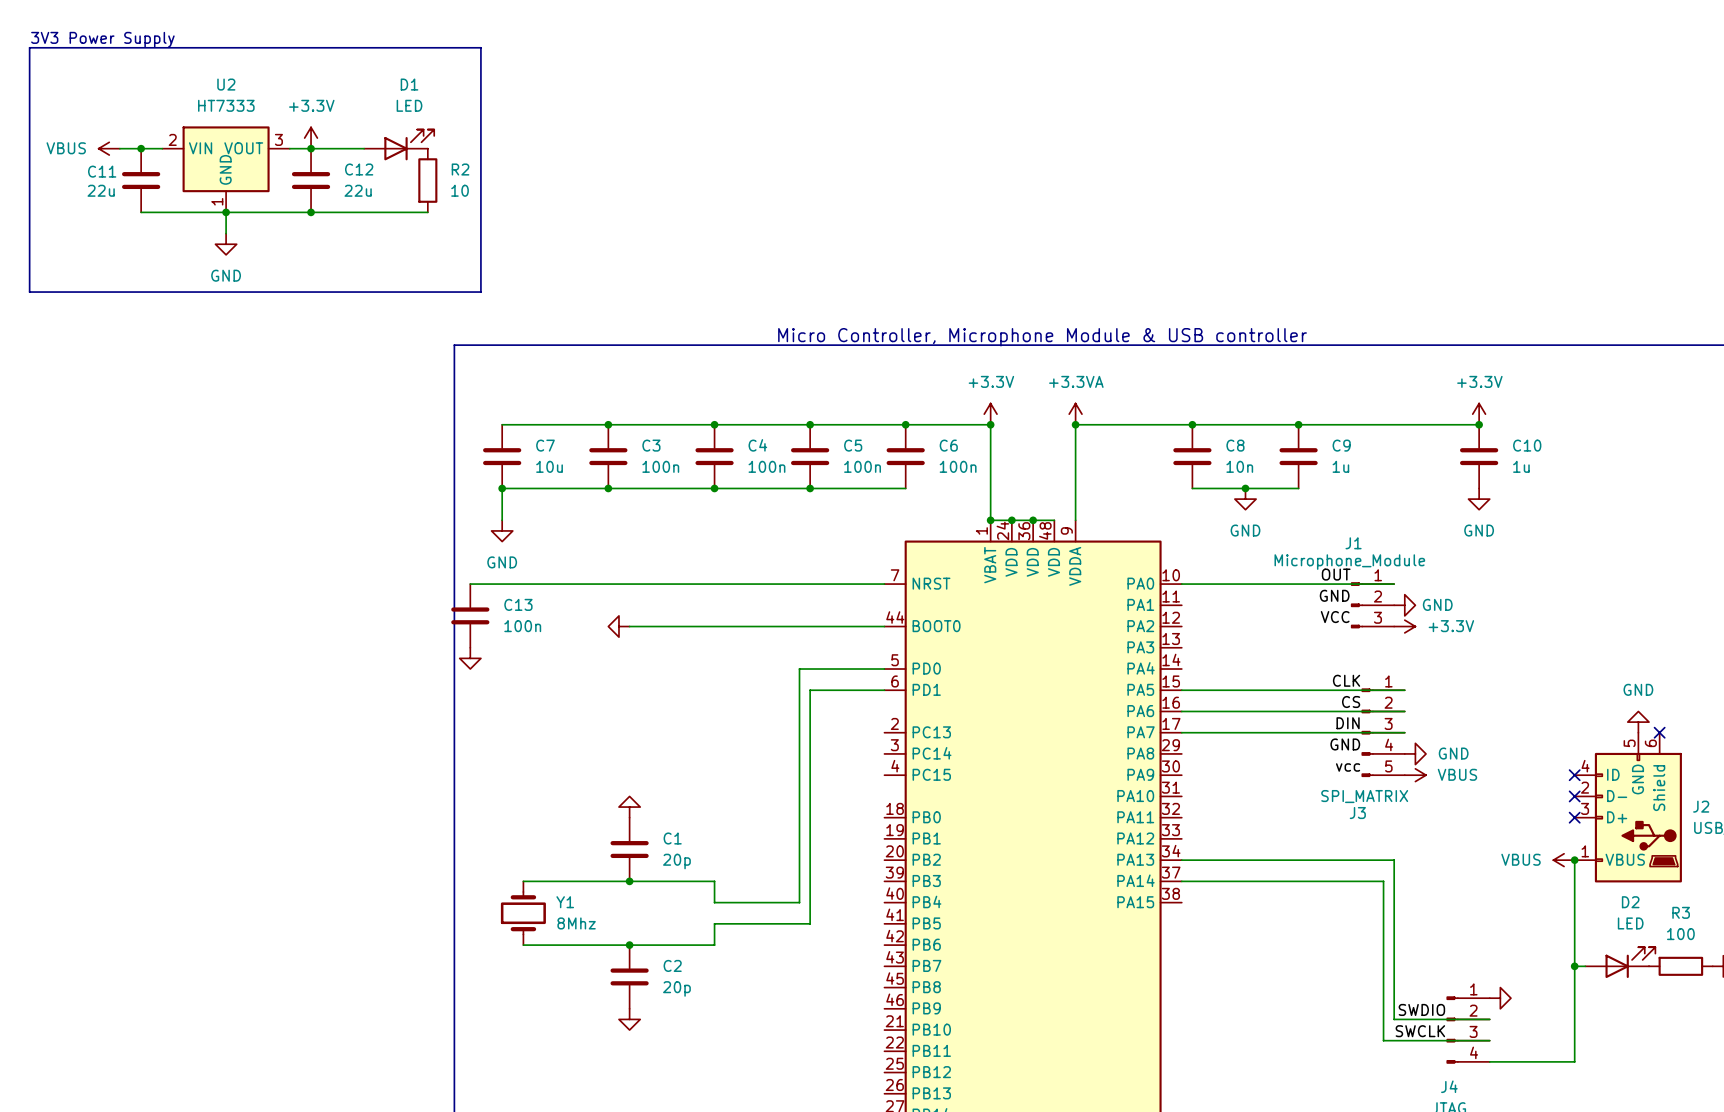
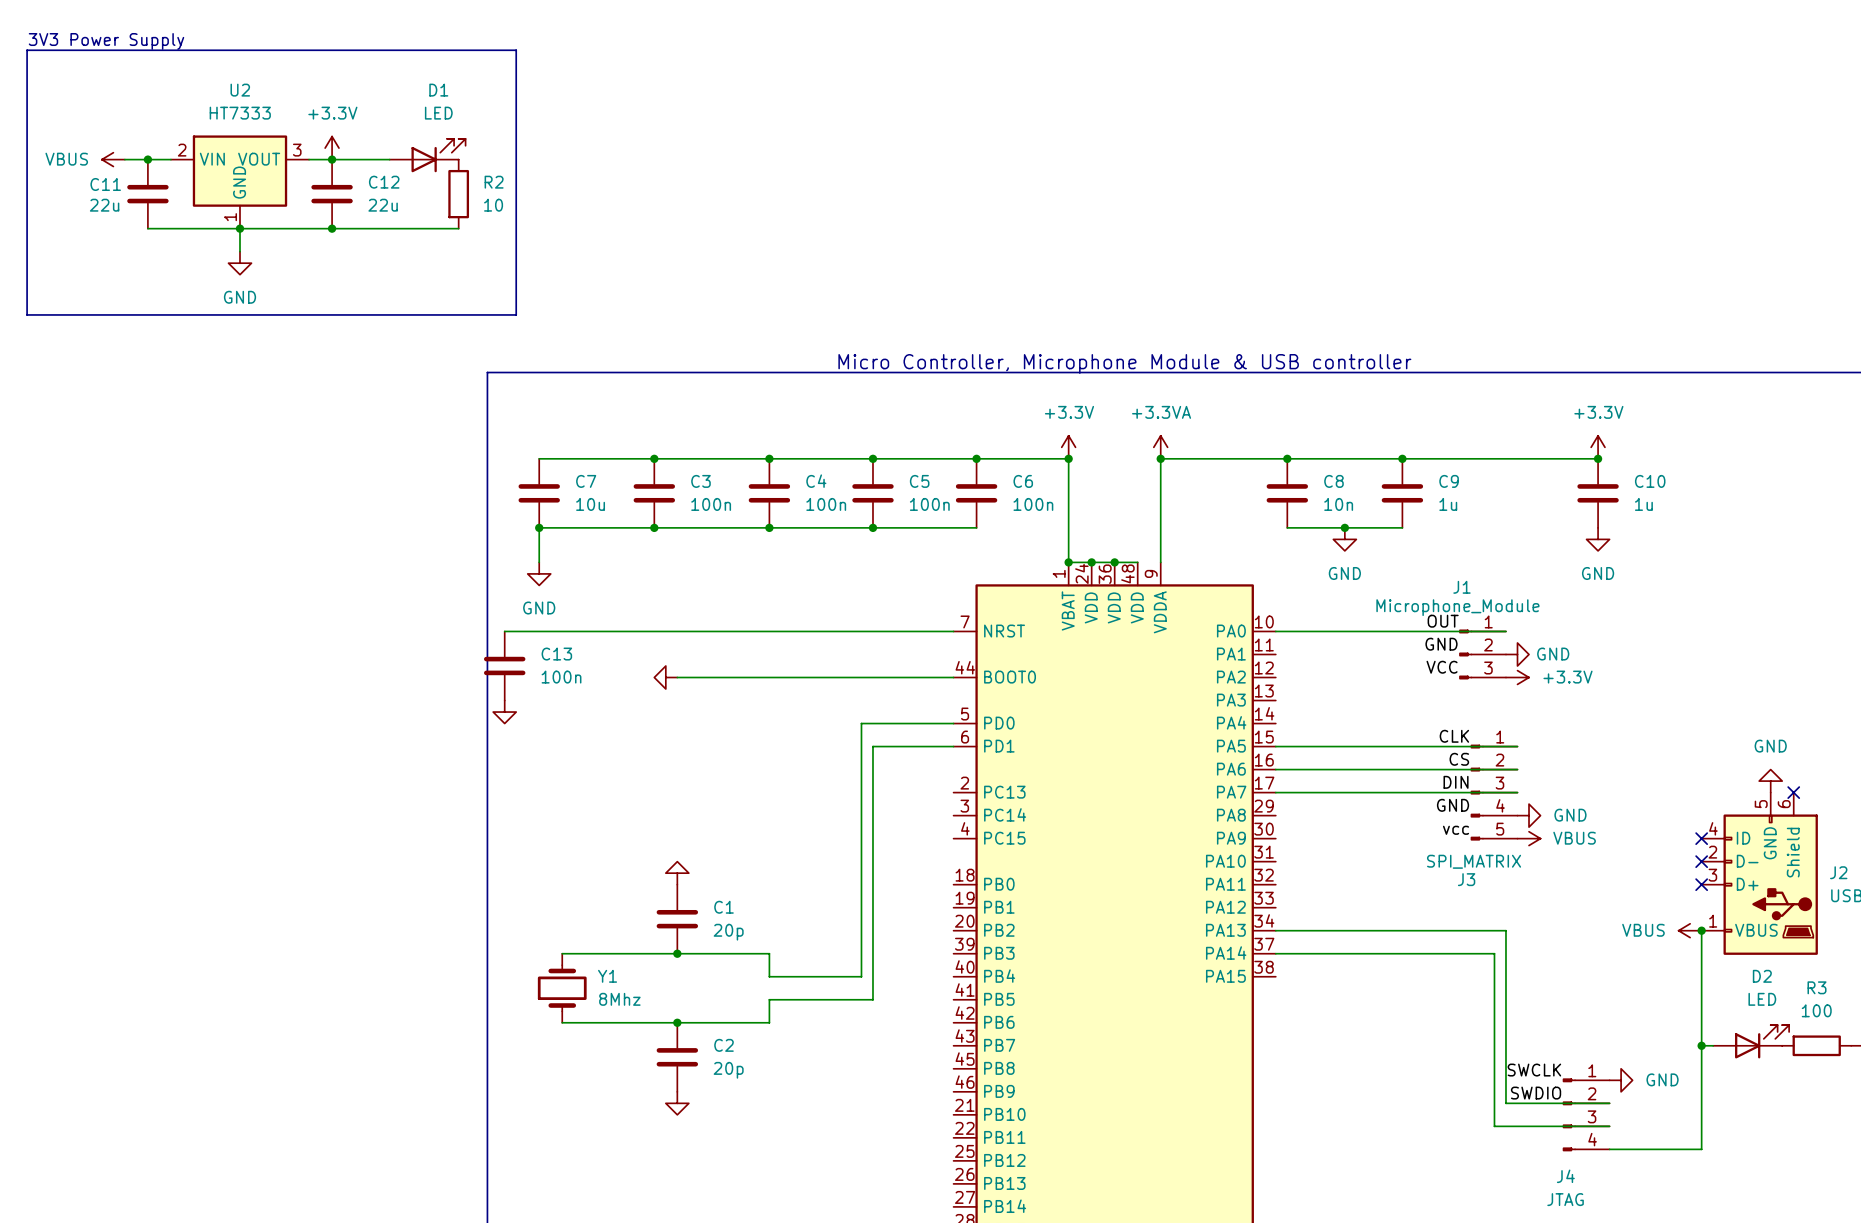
power symbol text: none -> GND (1662, 1079)
label position: SWCLK (1420, 1031) -> SWCLK (1534, 1070)

